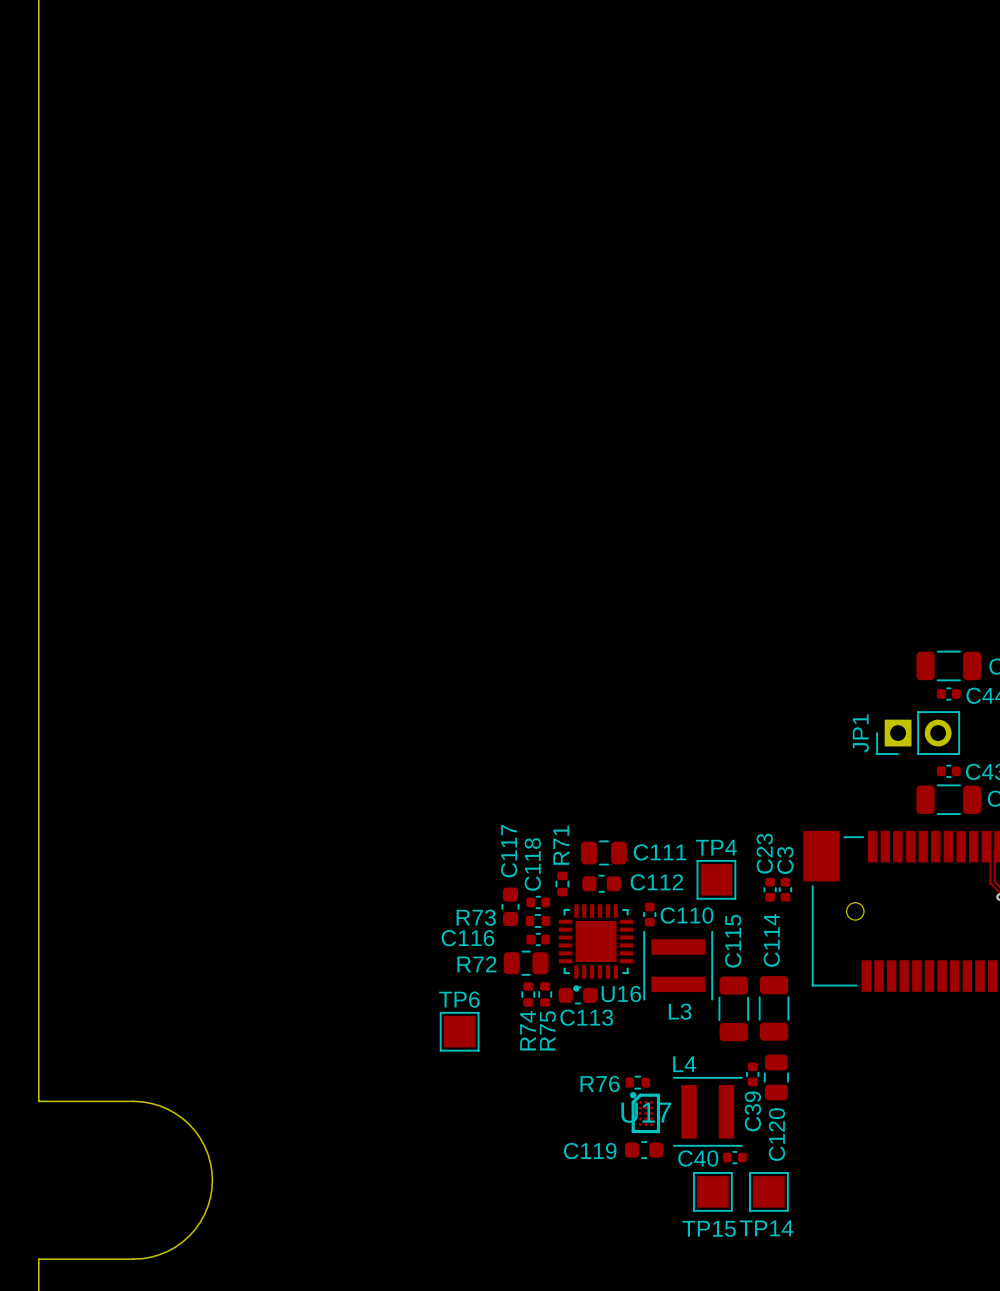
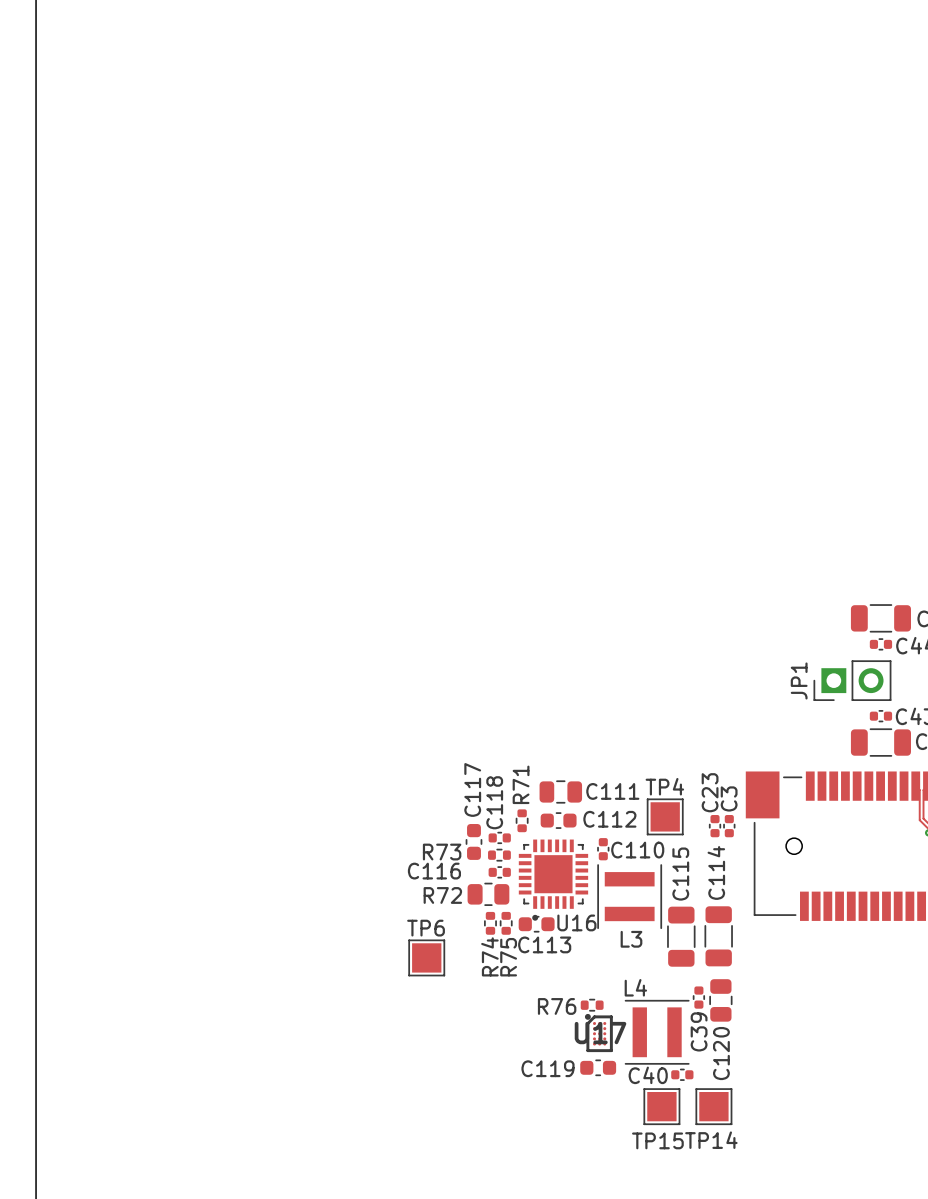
board edge: (38, 1101) (142, 1101) (167, 1109) (182, 1118) (200, 1138) (210, 1162) (212, 1180) (210, 1197) (200, 1222) (189, 1236) (167, 1251) (142, 1258) (38, 1259) -> (36, 1022) (36, 1169)

